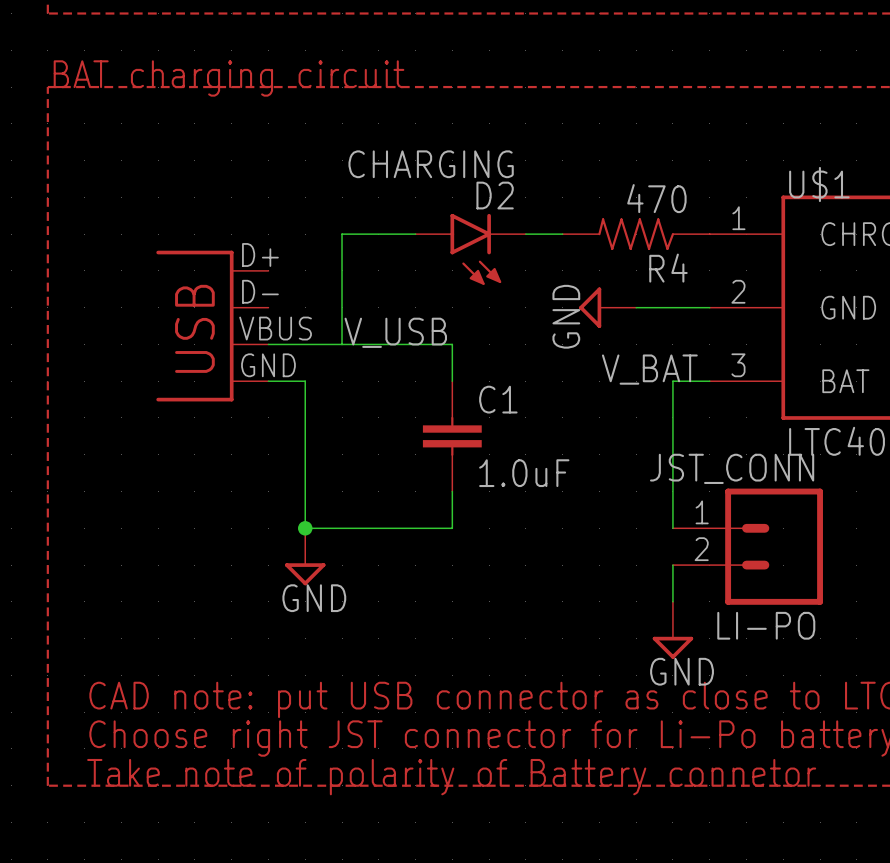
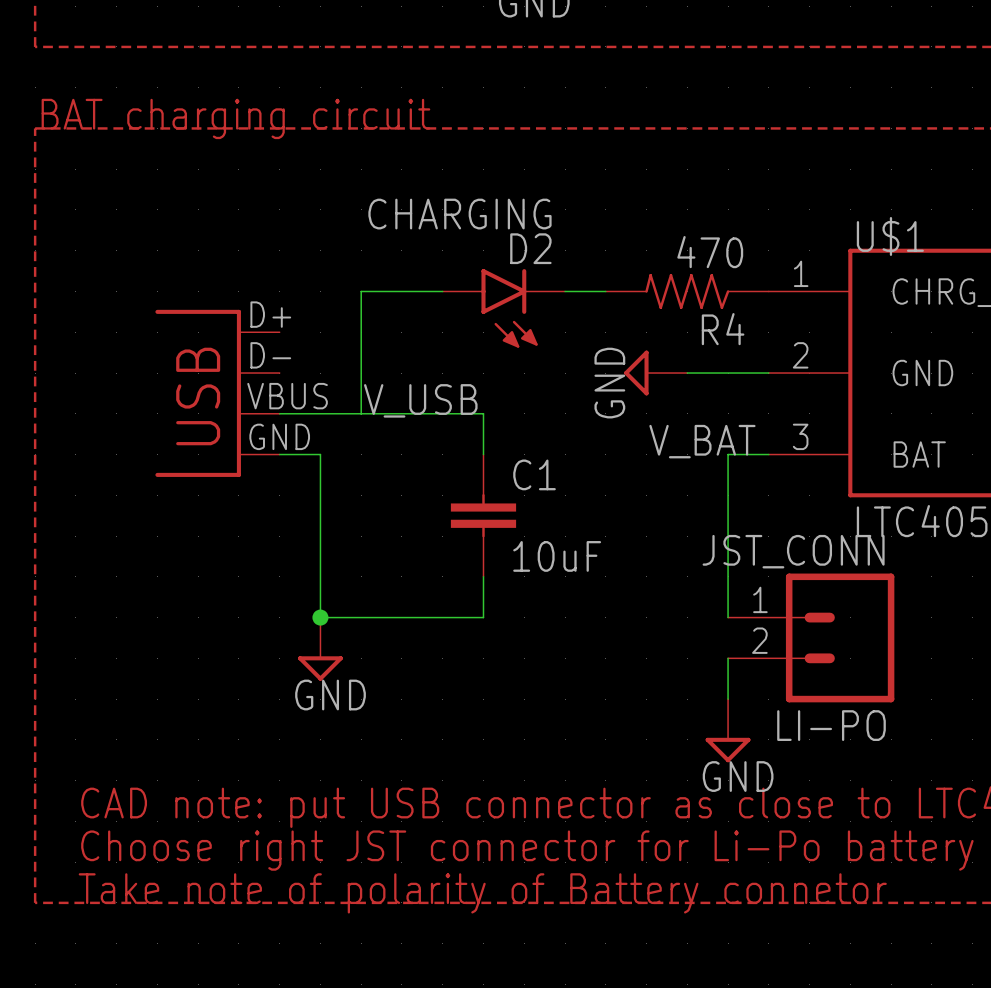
C1 value: 1.0uF (524, 473) -> 10uF (557, 556)

